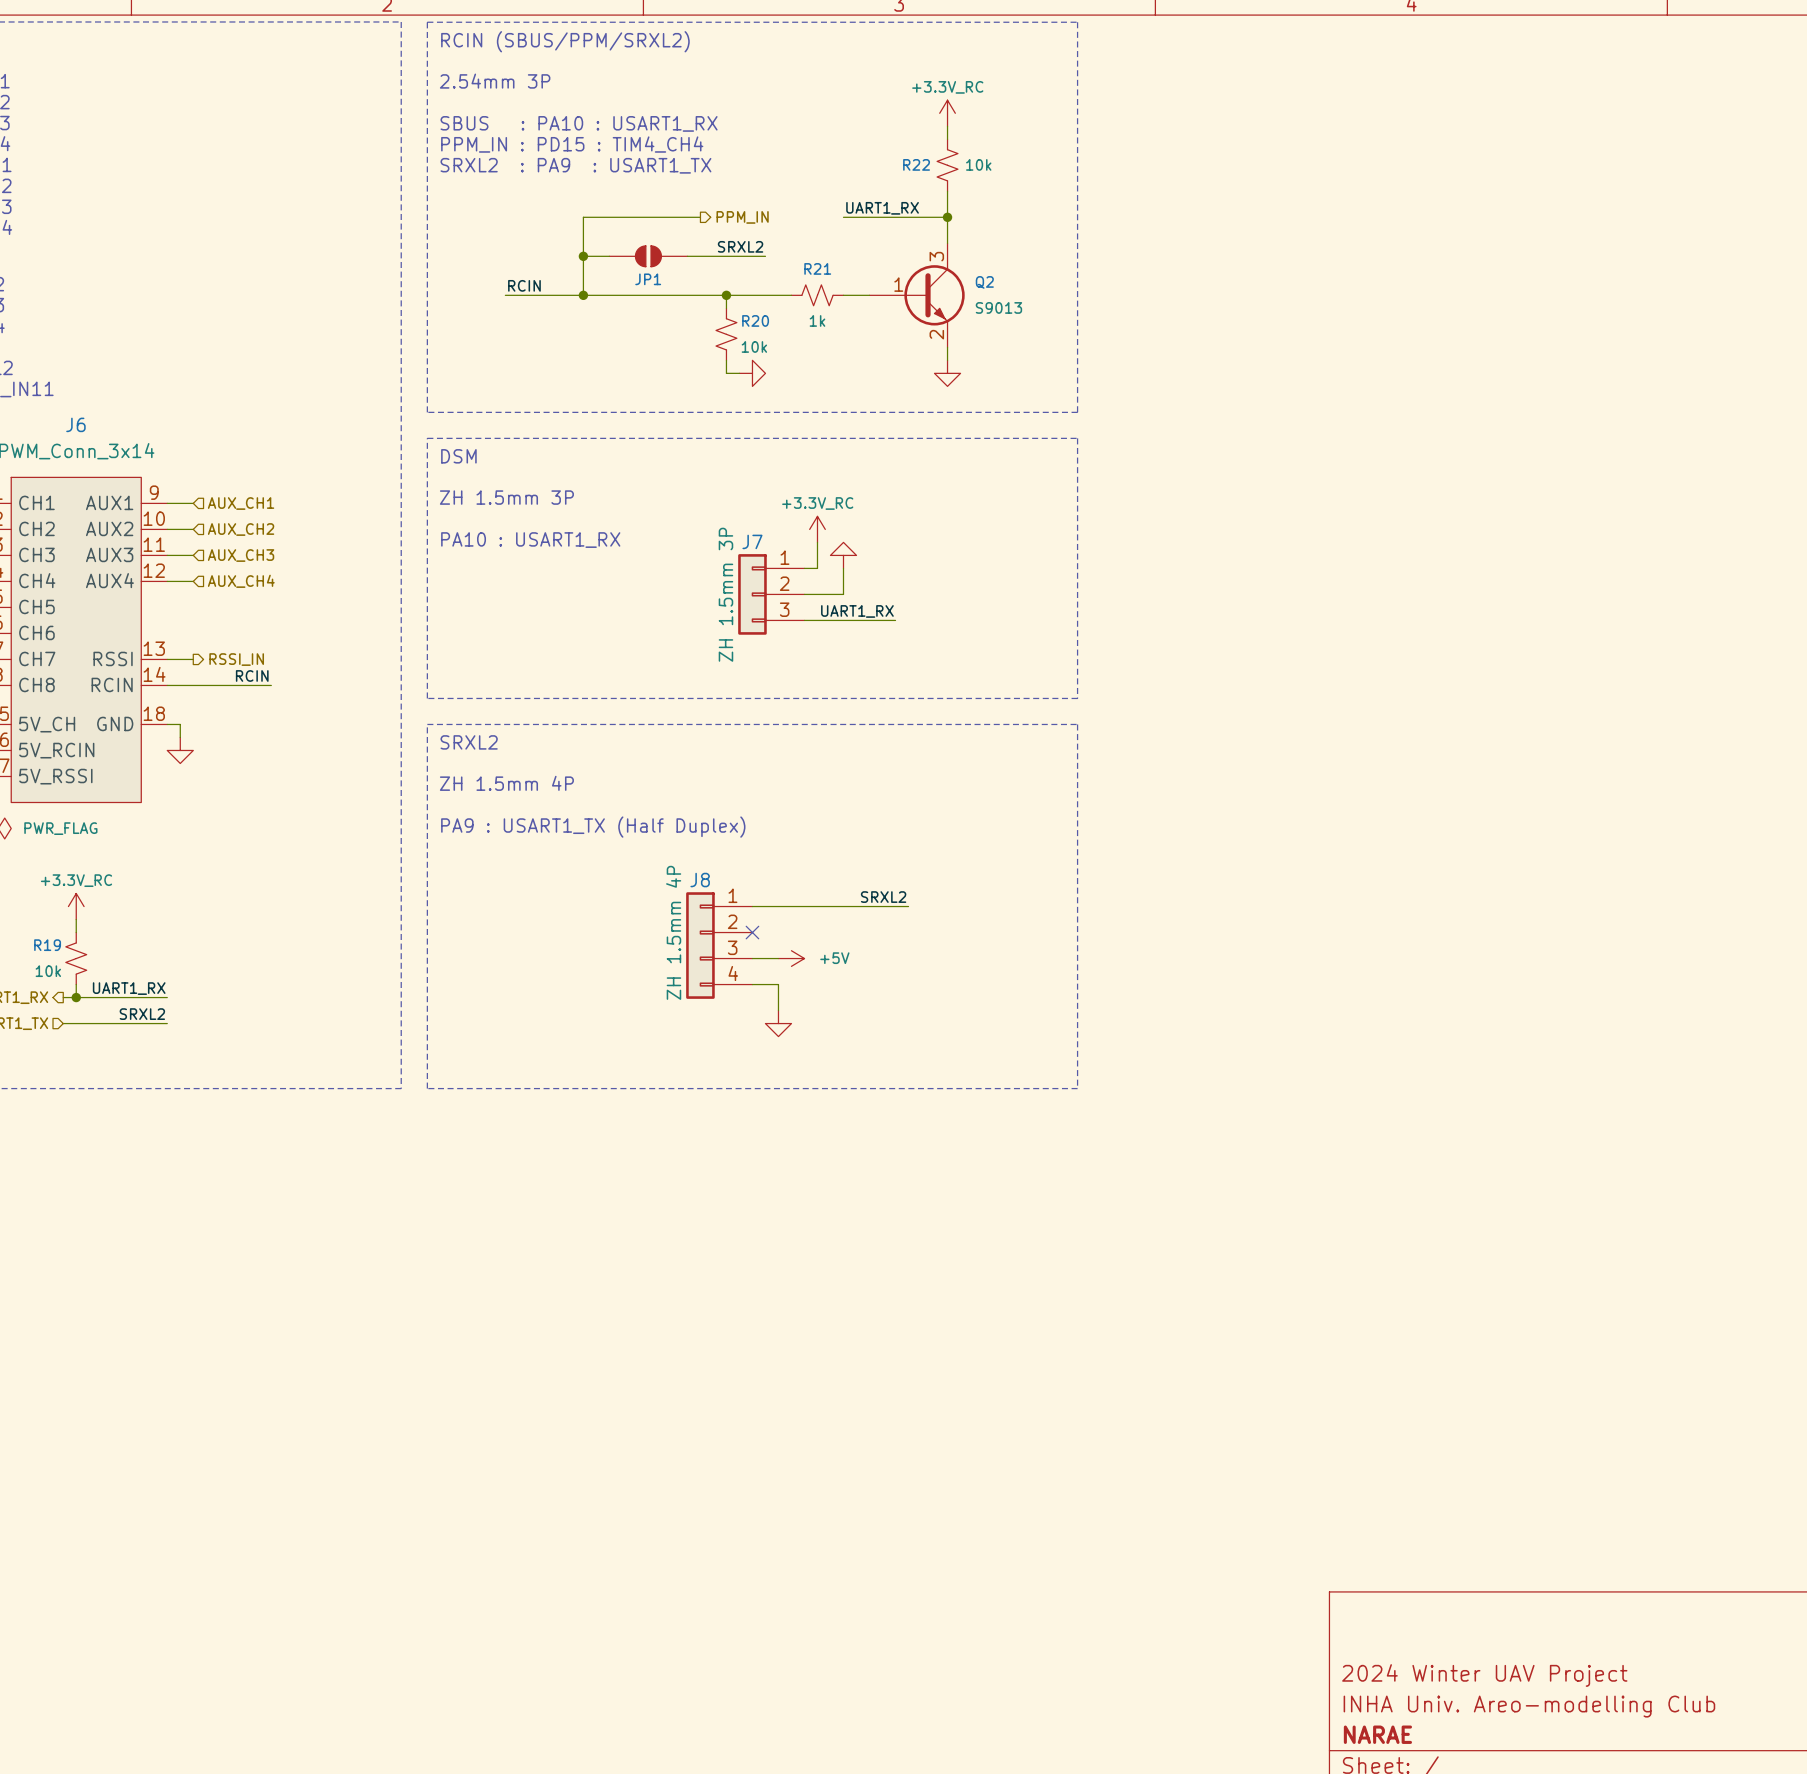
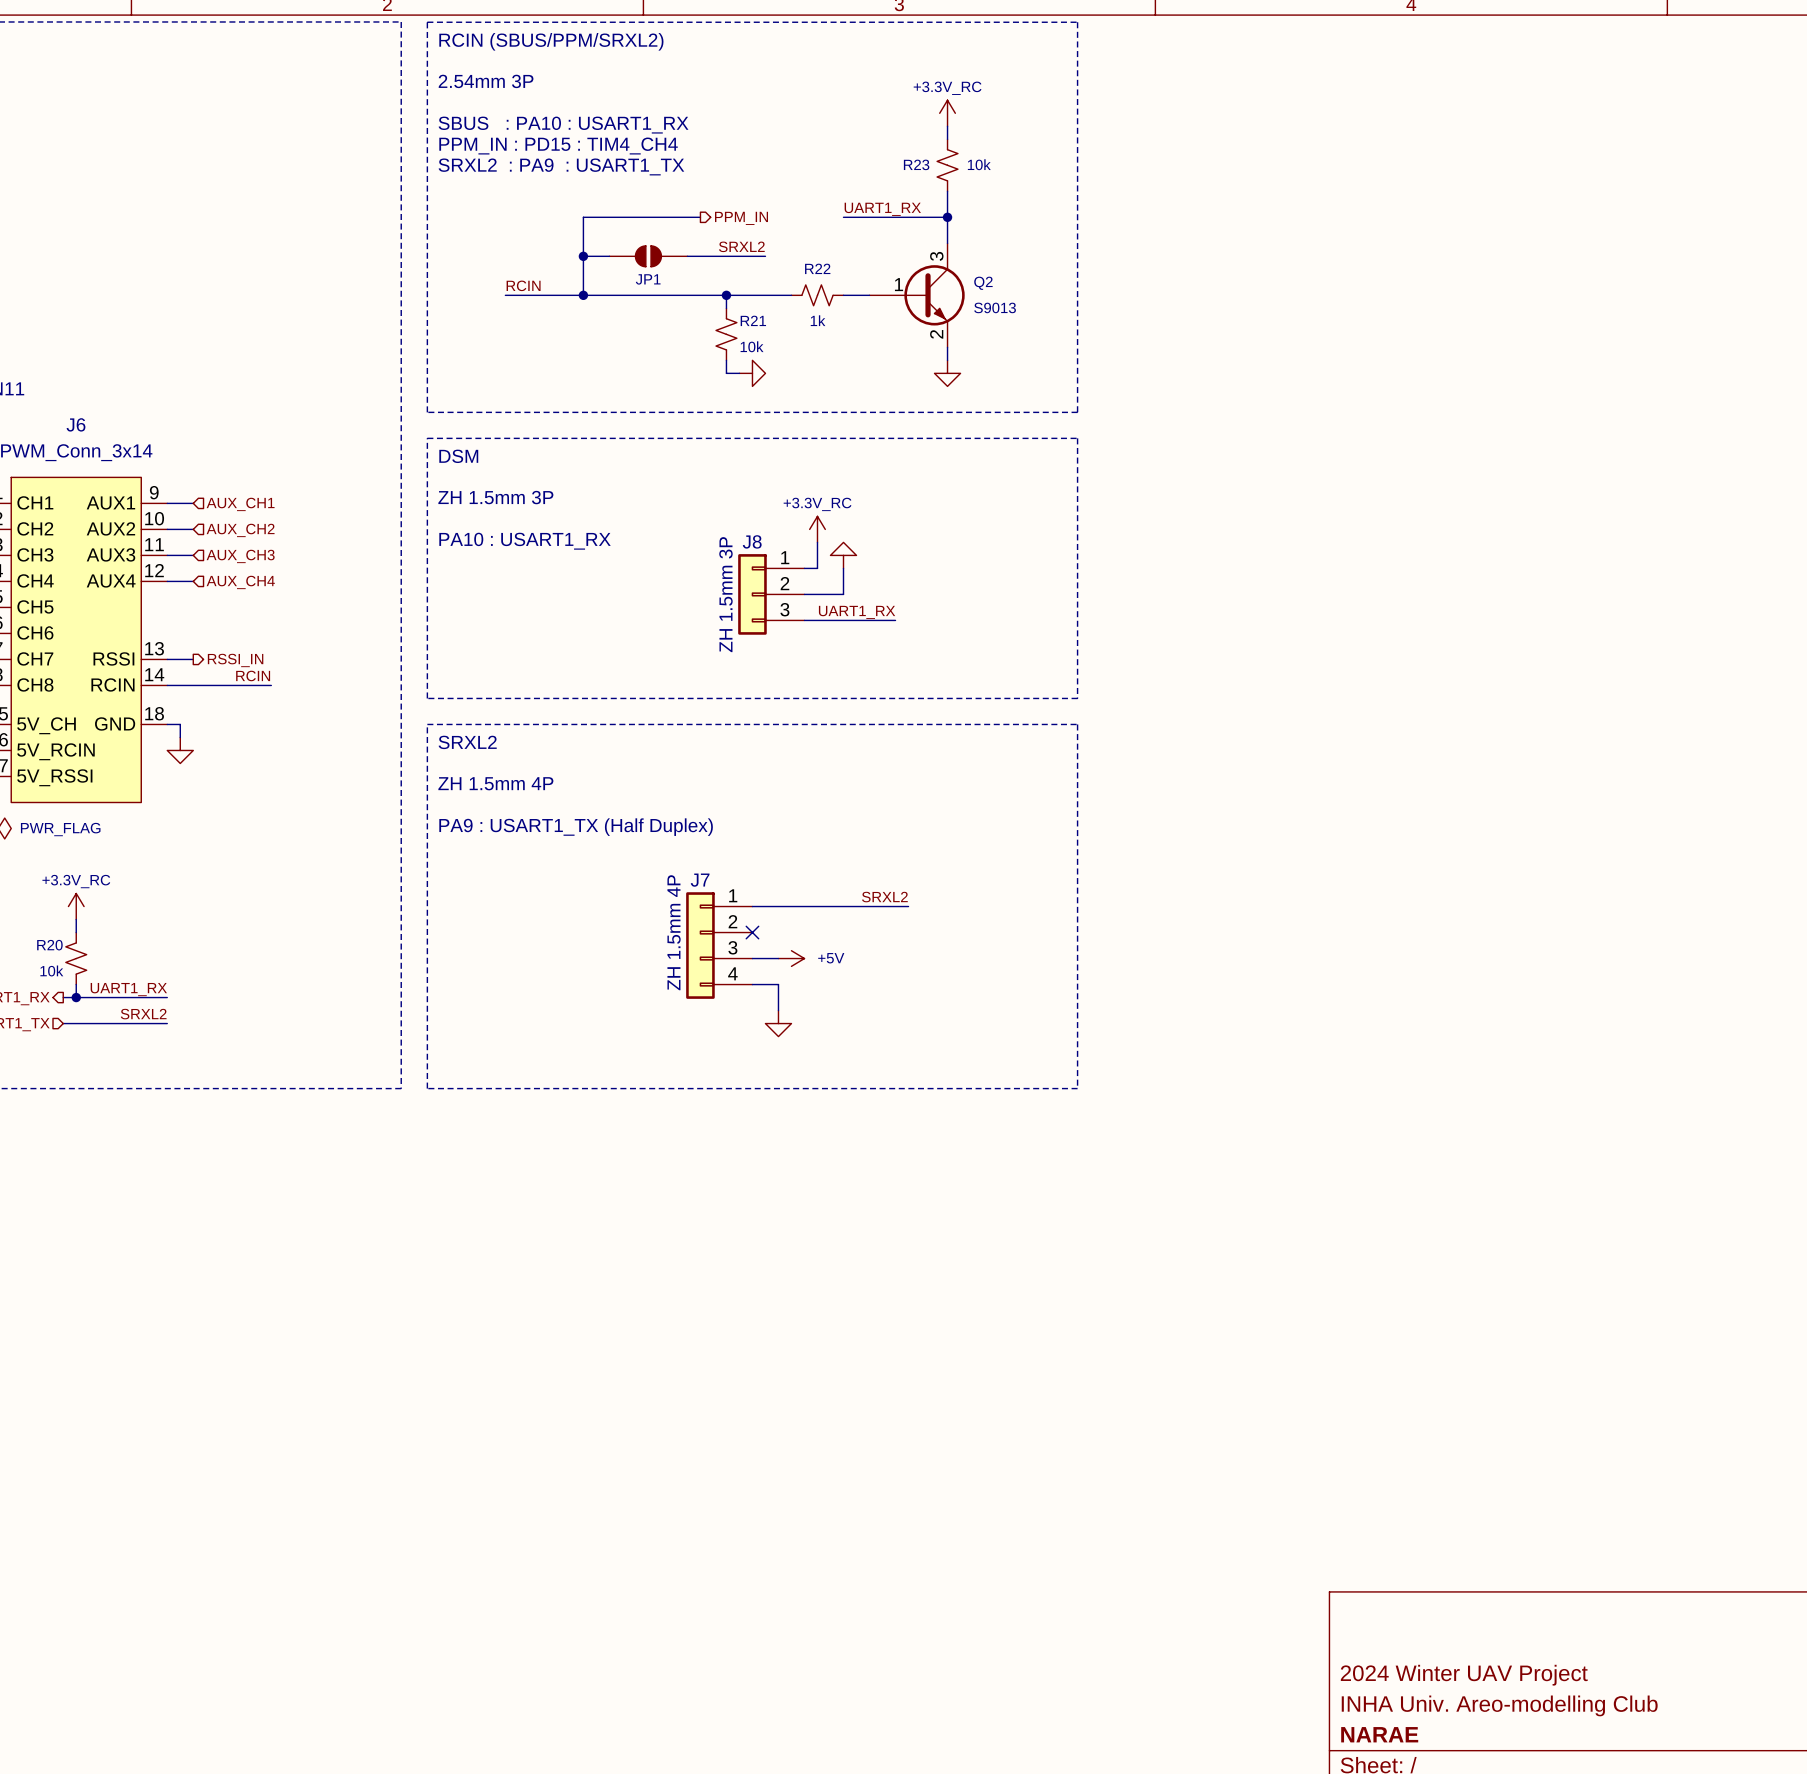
R22 name: R22 (916, 164) -> R23 (916, 164)
R21 name: R21 (817, 268) -> R22 (817, 268)
R20 name: R20 (755, 320) -> R21 (753, 320)
J7 name: J7 (752, 541) -> J8 (752, 541)
J8 name: J8 (700, 880) -> J7 (700, 880)
R19 name: R19 (47, 945) -> R20 (49, 945)

